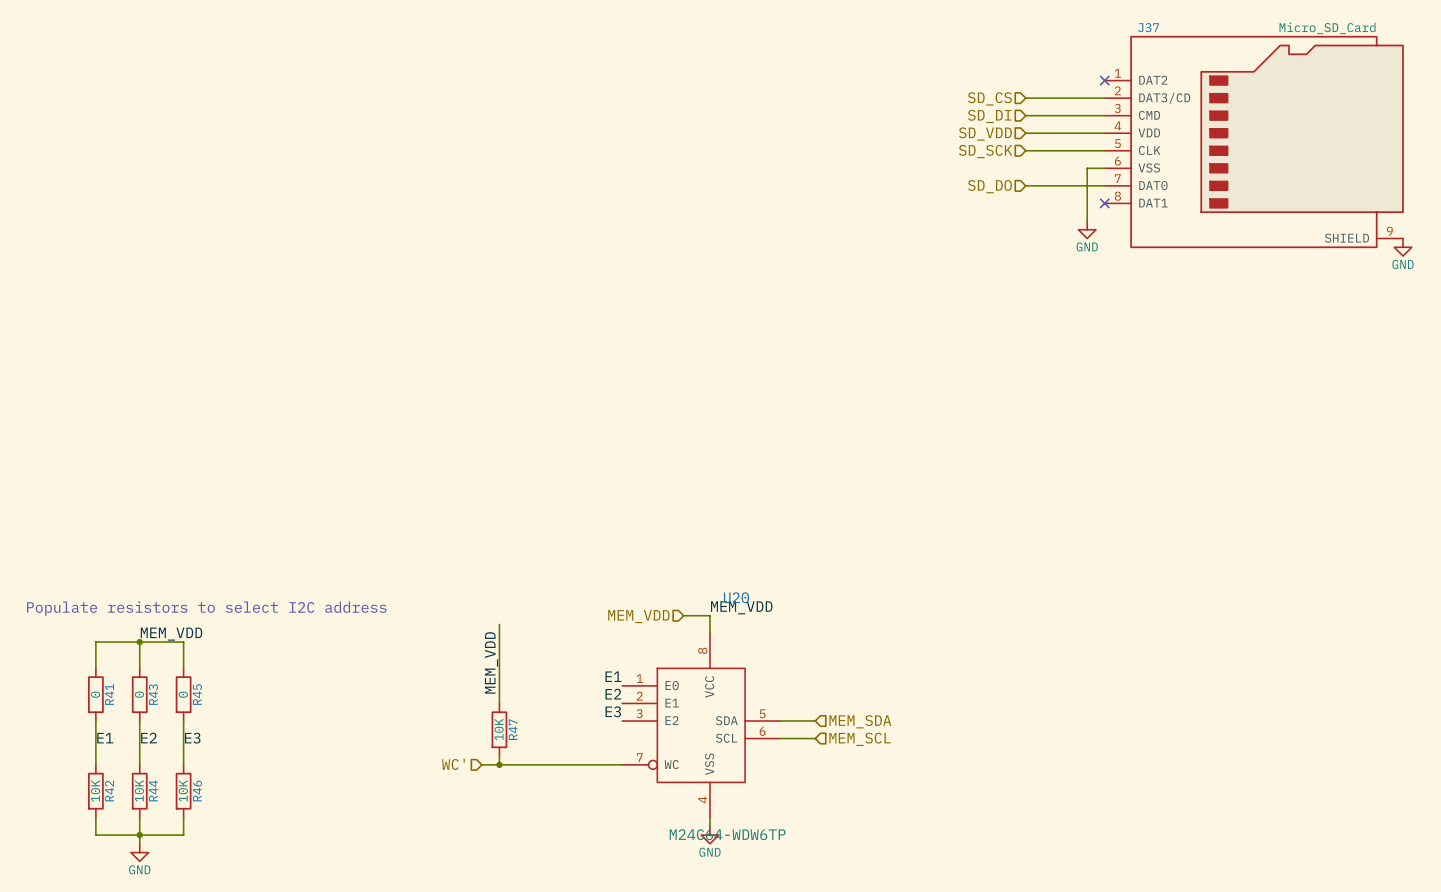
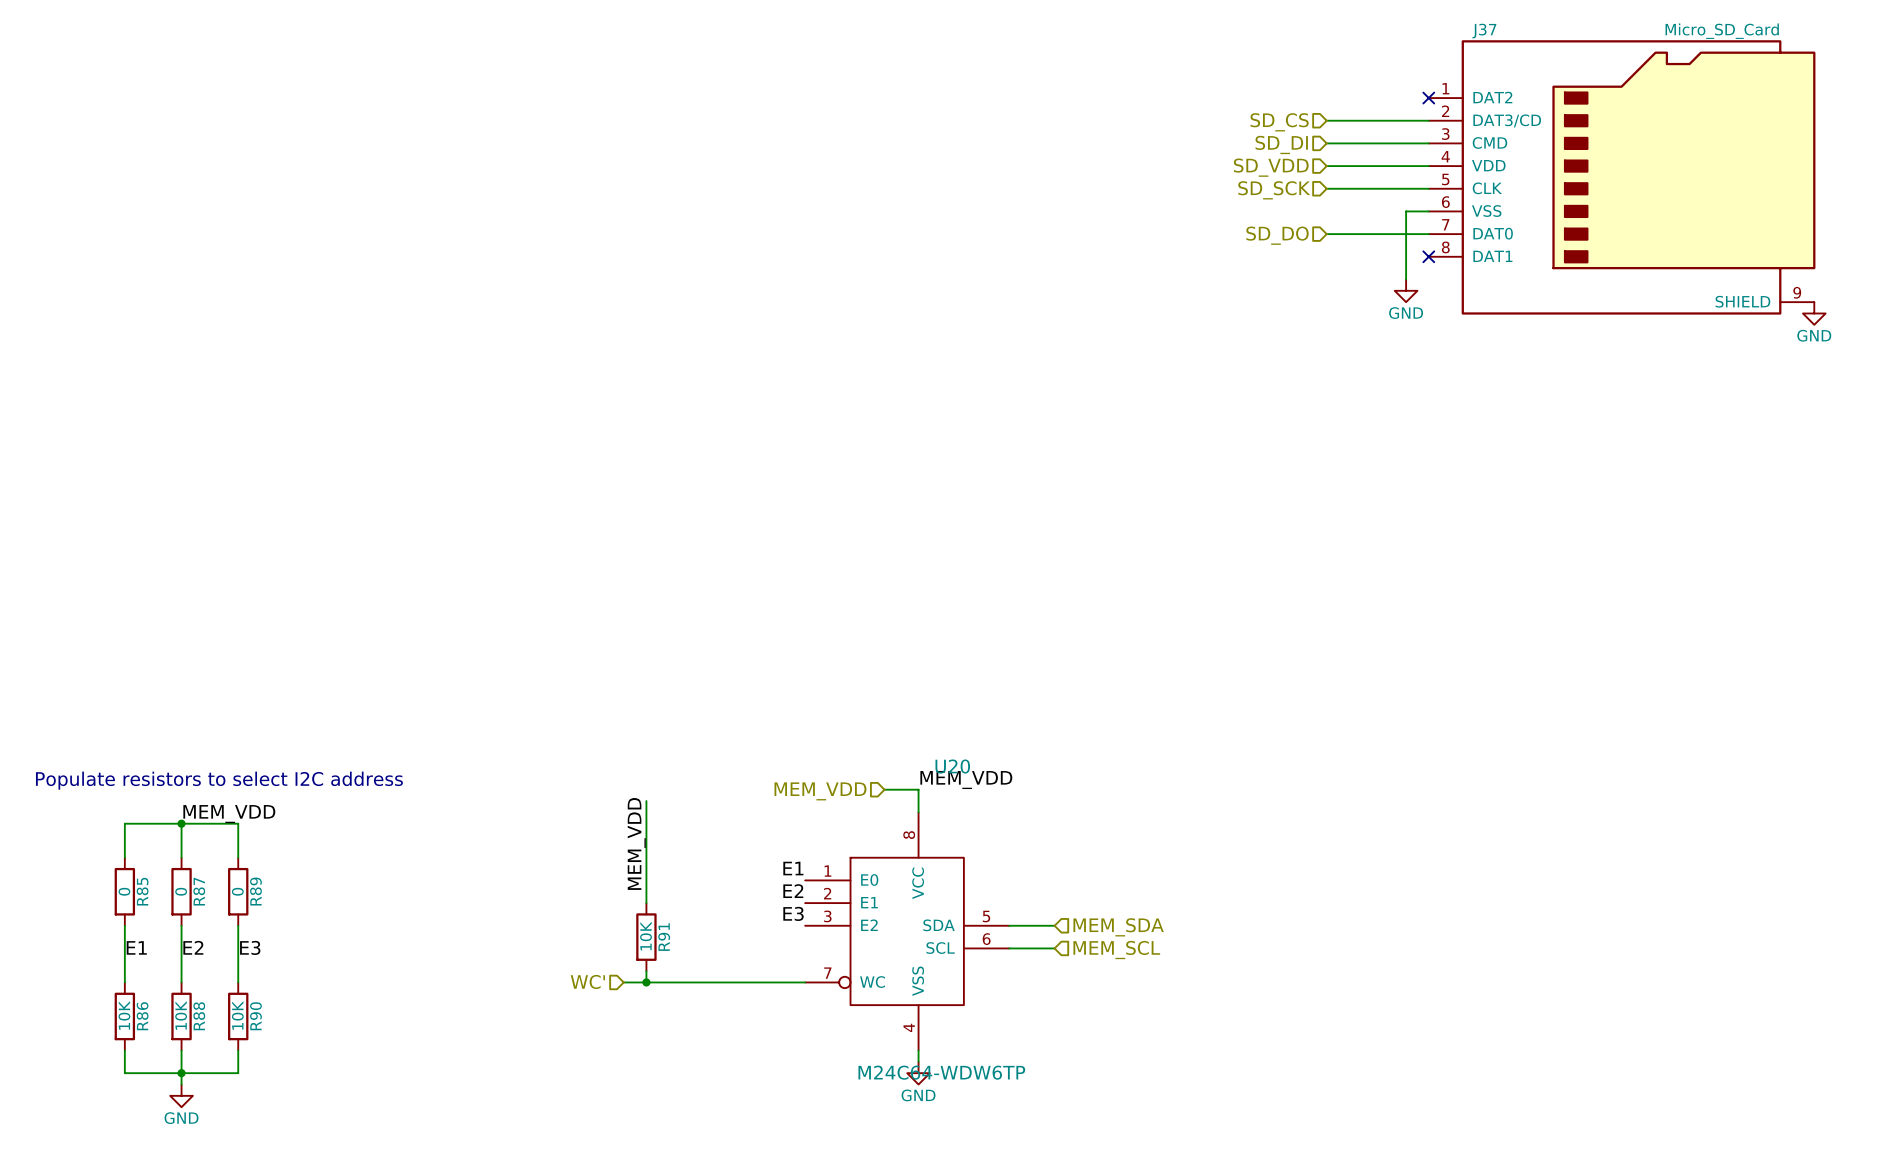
R41 name: R41 (109, 694) -> R85 (142, 891)
R43 name: R43 (153, 694) -> R87 (199, 891)
R45 name: R45 (197, 694) -> R89 (255, 891)
R47 name: R47 (513, 729) -> R91 (664, 937)
R44 name: R44 (153, 790) -> R88 (199, 1016)
R42 name: R42 (109, 791) -> R86 (142, 1016)
R46 name: R46 (197, 791) -> R90 (255, 1016)

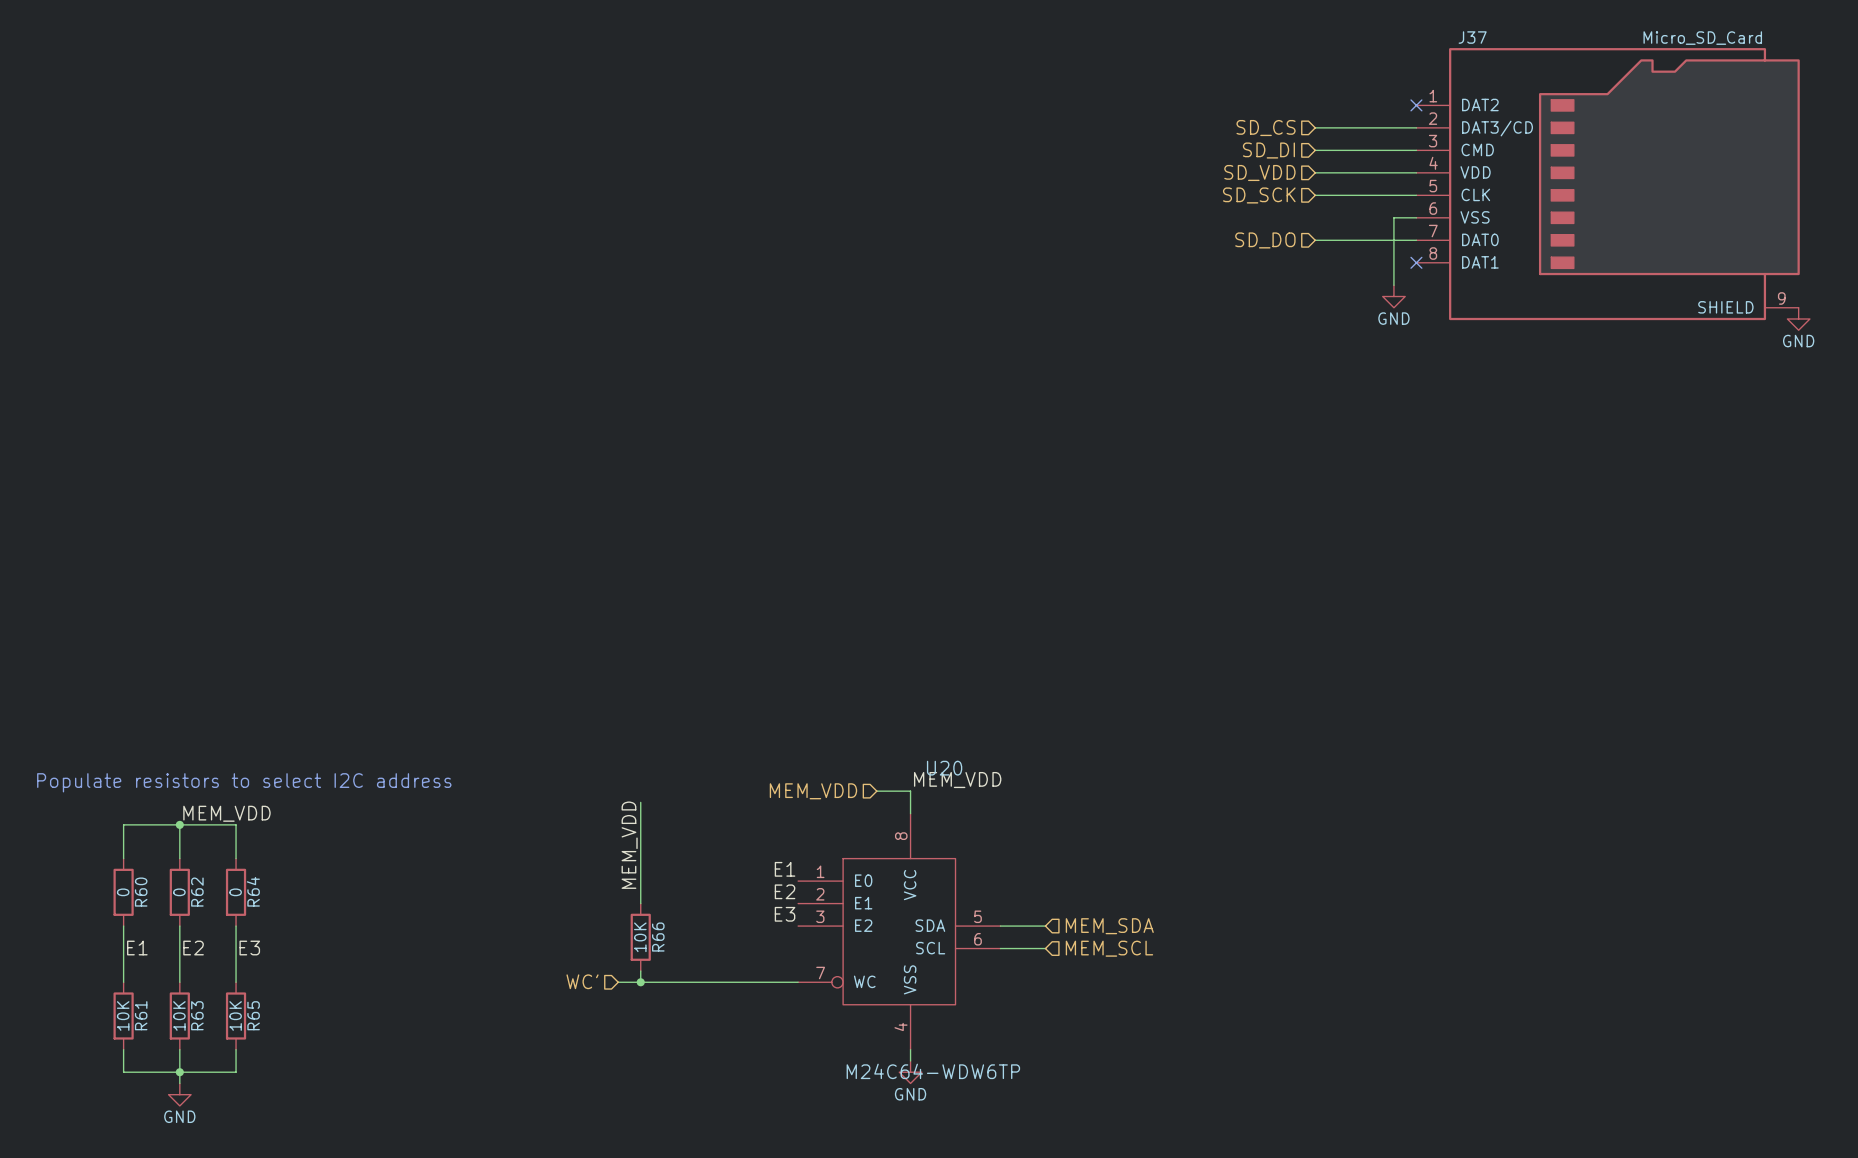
R85 name: R85 (142, 891) -> R60 (141, 892)
R87 name: R87 (199, 891) -> R62 (197, 892)
R89 name: R89 (255, 891) -> R64 (253, 891)
R91 name: R91 (664, 937) -> R66 (658, 937)
R86 name: R86 (142, 1016) -> R61 (141, 1015)
R88 name: R88 (199, 1016) -> R63 (197, 1015)
R90 name: R90 (255, 1016) -> R65 (253, 1015)

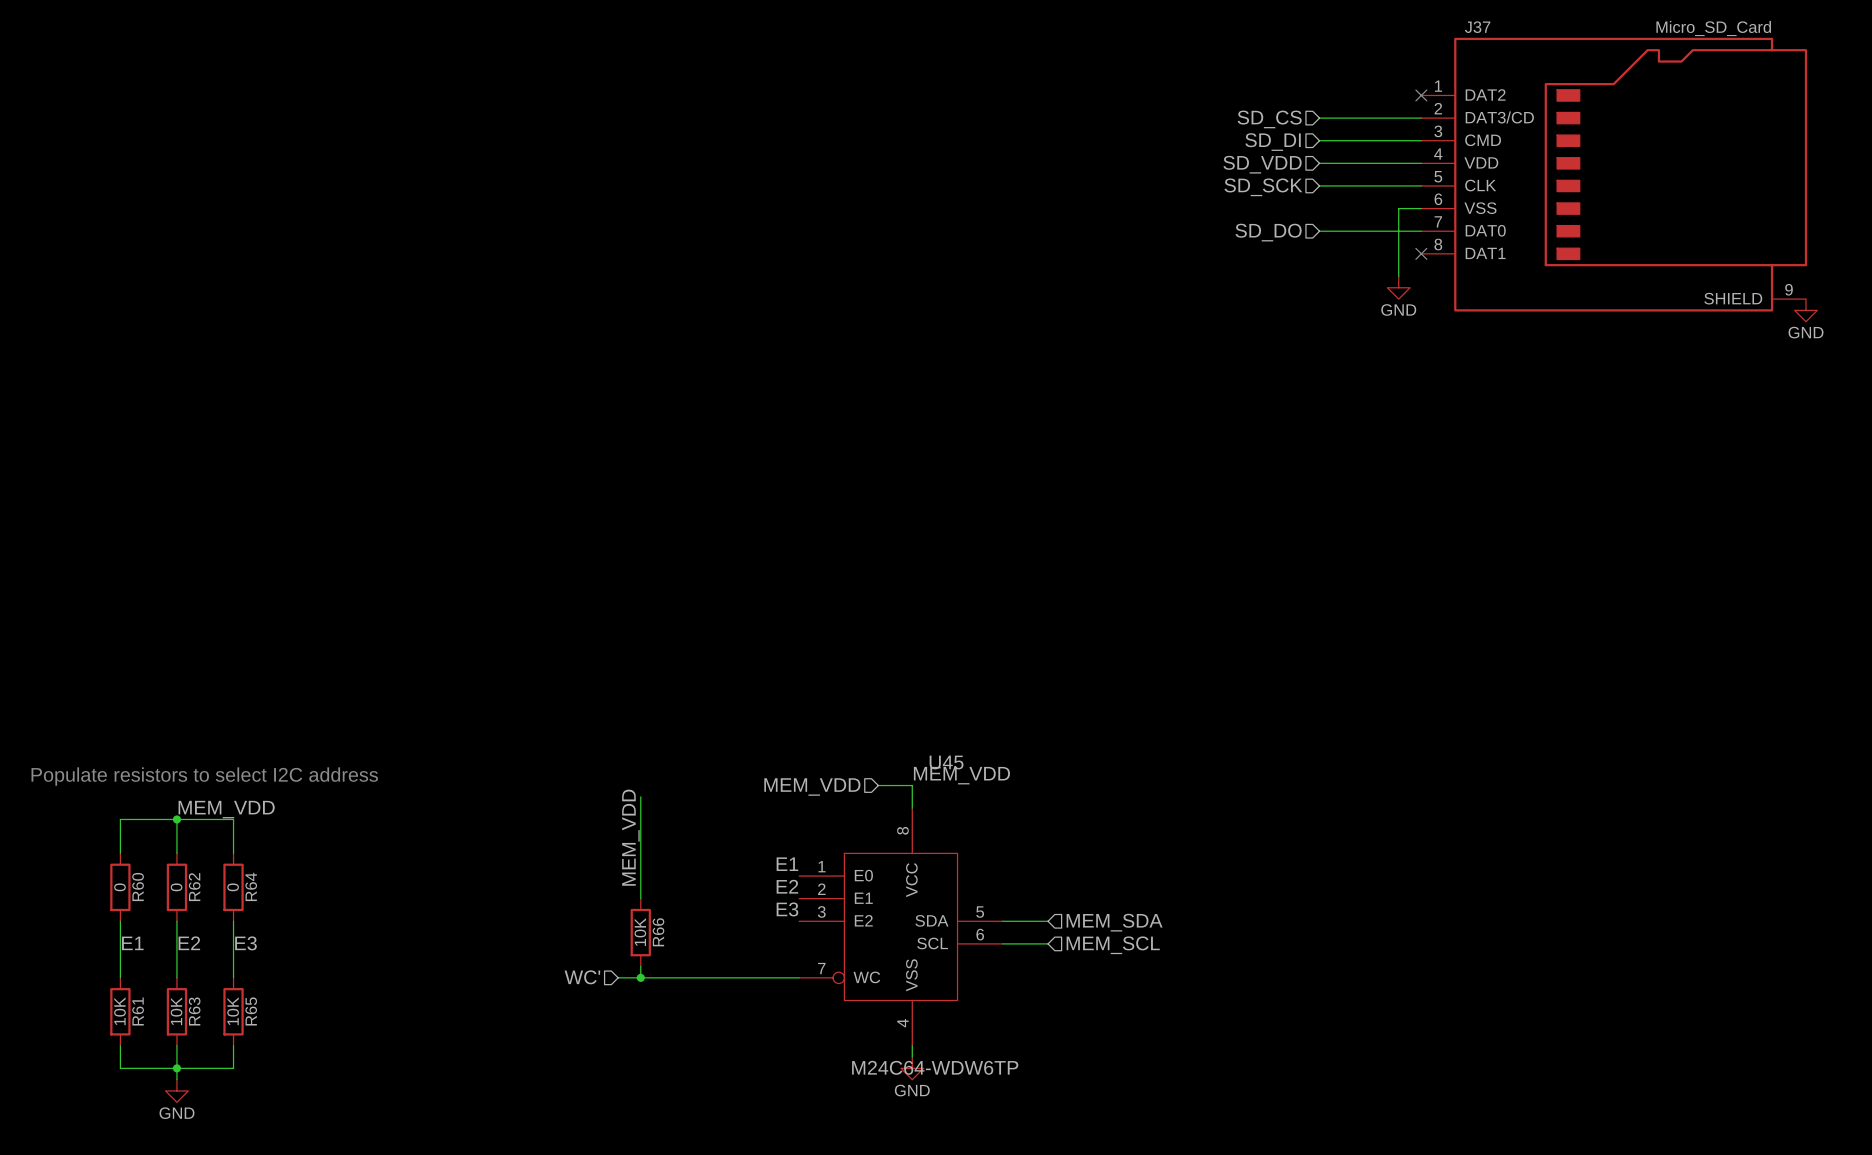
U20 name: U20 (944, 768) -> U45 (946, 762)

